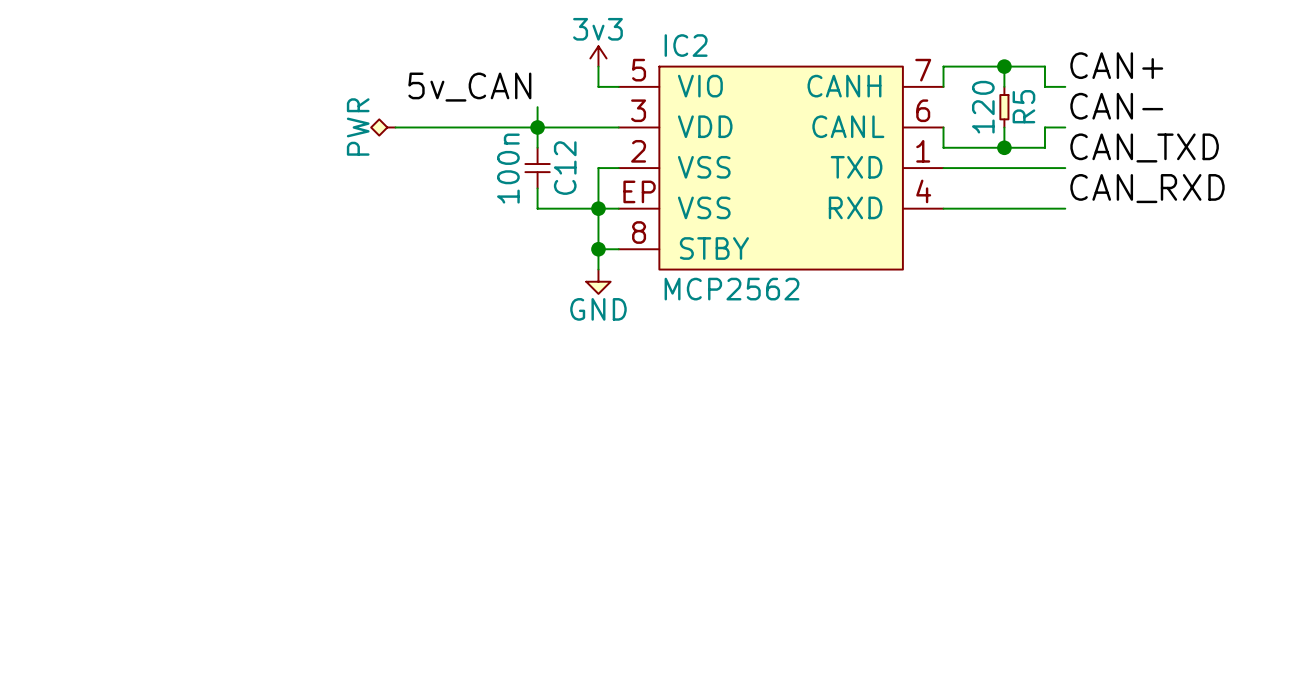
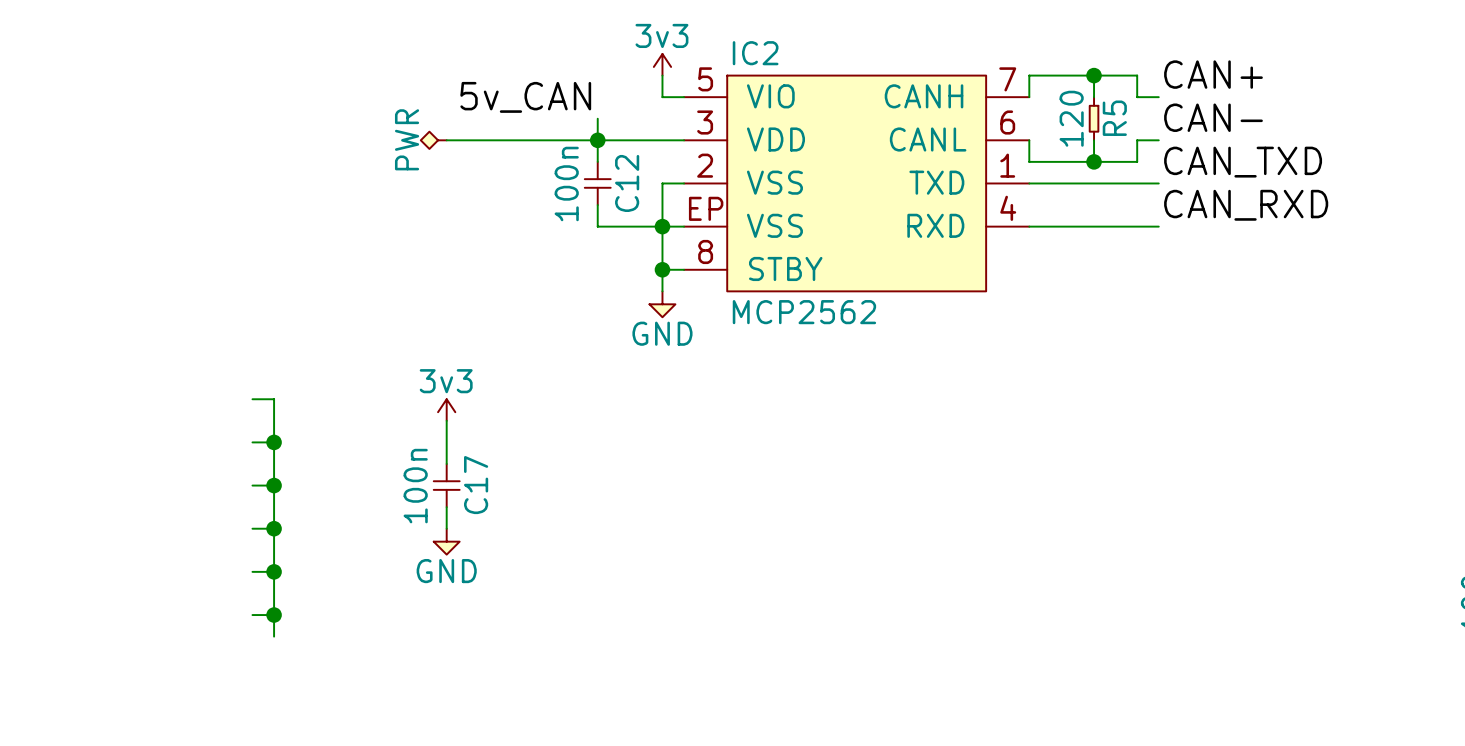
wire: none -> (252, 399) (274, 399) (274, 636)
power symbol: none -> 3v3 (446, 410)
wire: none -> (446, 420) (446, 463)
wire: none -> (252, 442) (274, 442)
junction: none -> (274, 442)
wire: none -> (252, 485) (274, 485)
junction: none -> (274, 485)
C17: none -> 100n (446, 485)
wire: none -> (446, 507) (446, 528)
wire: none -> (252, 528) (274, 528)
junction: none -> (274, 528)
power symbol: none -> GND (446, 541)
wire: none -> (252, 571) (274, 571)
junction: none -> (274, 571)
wire: none -> (252, 615) (274, 615)
junction: none -> (274, 615)

